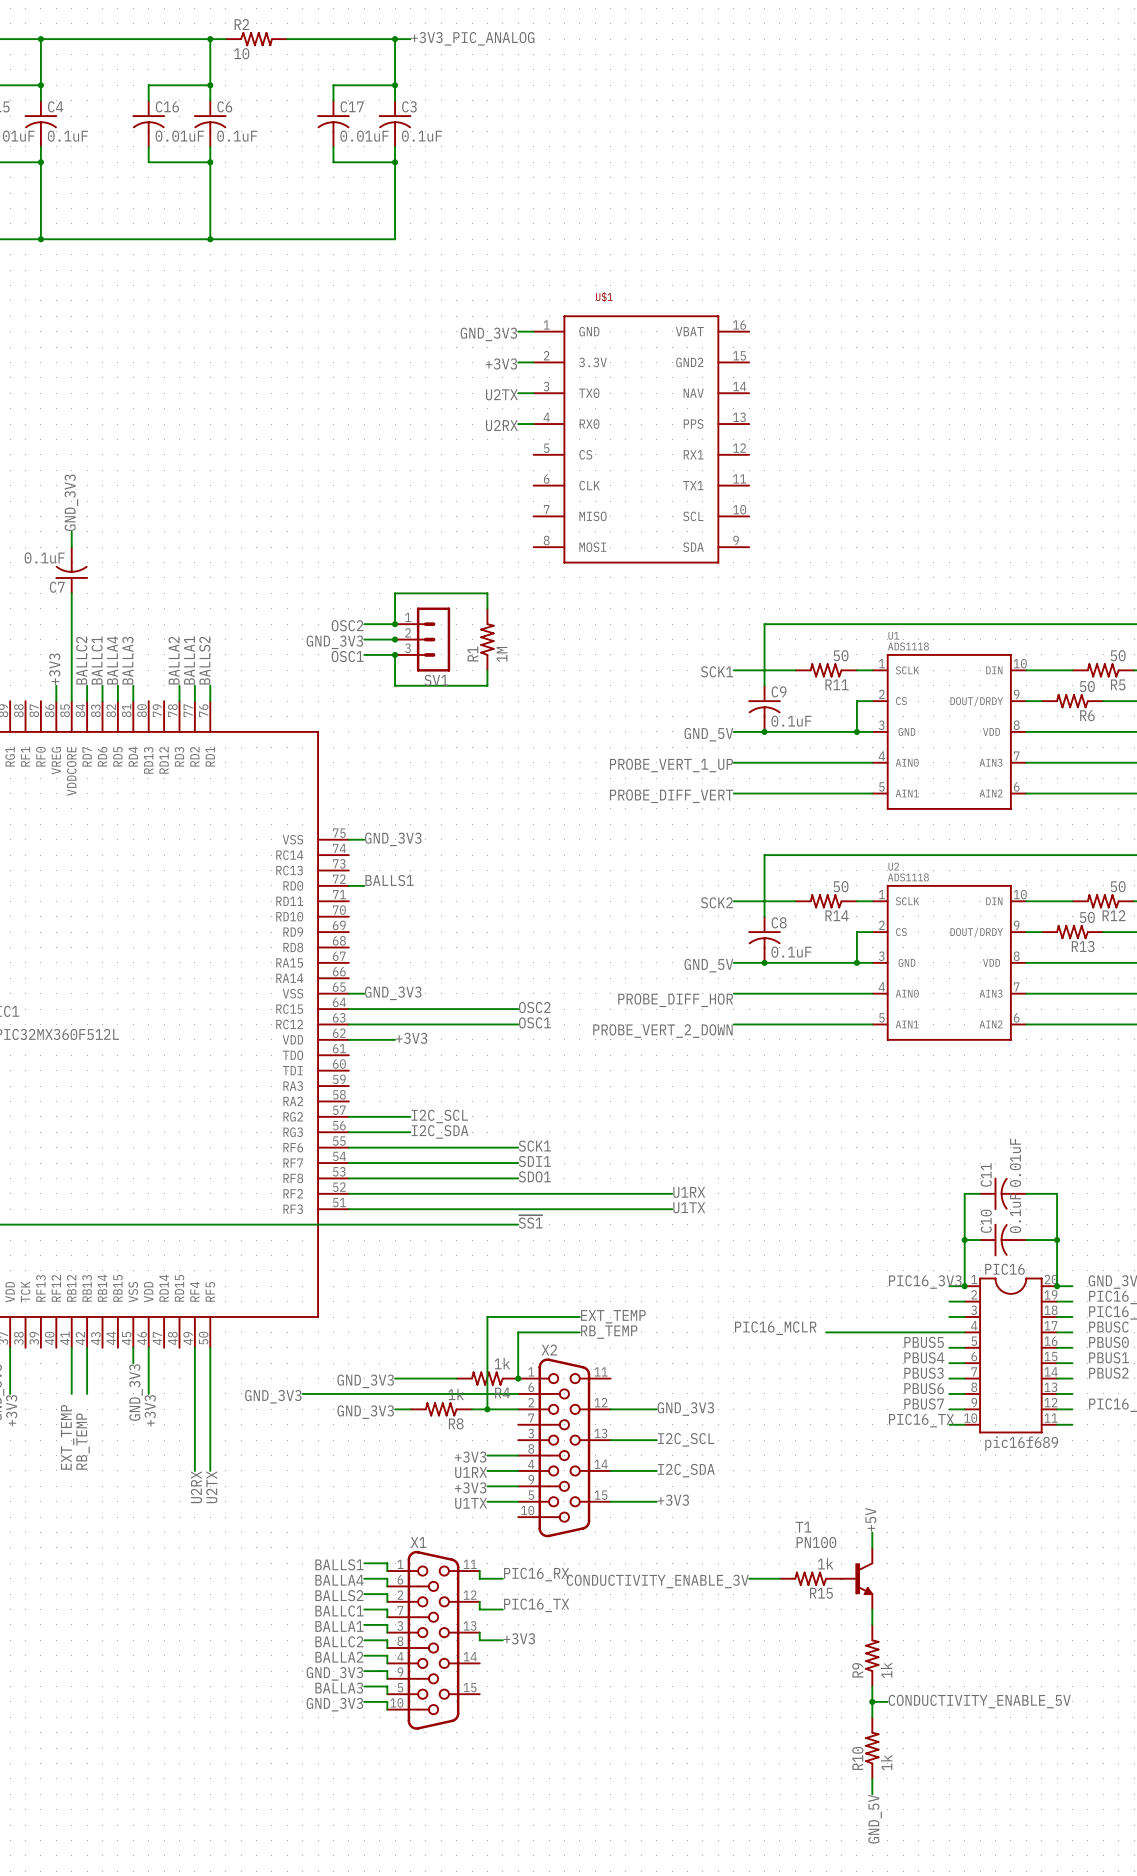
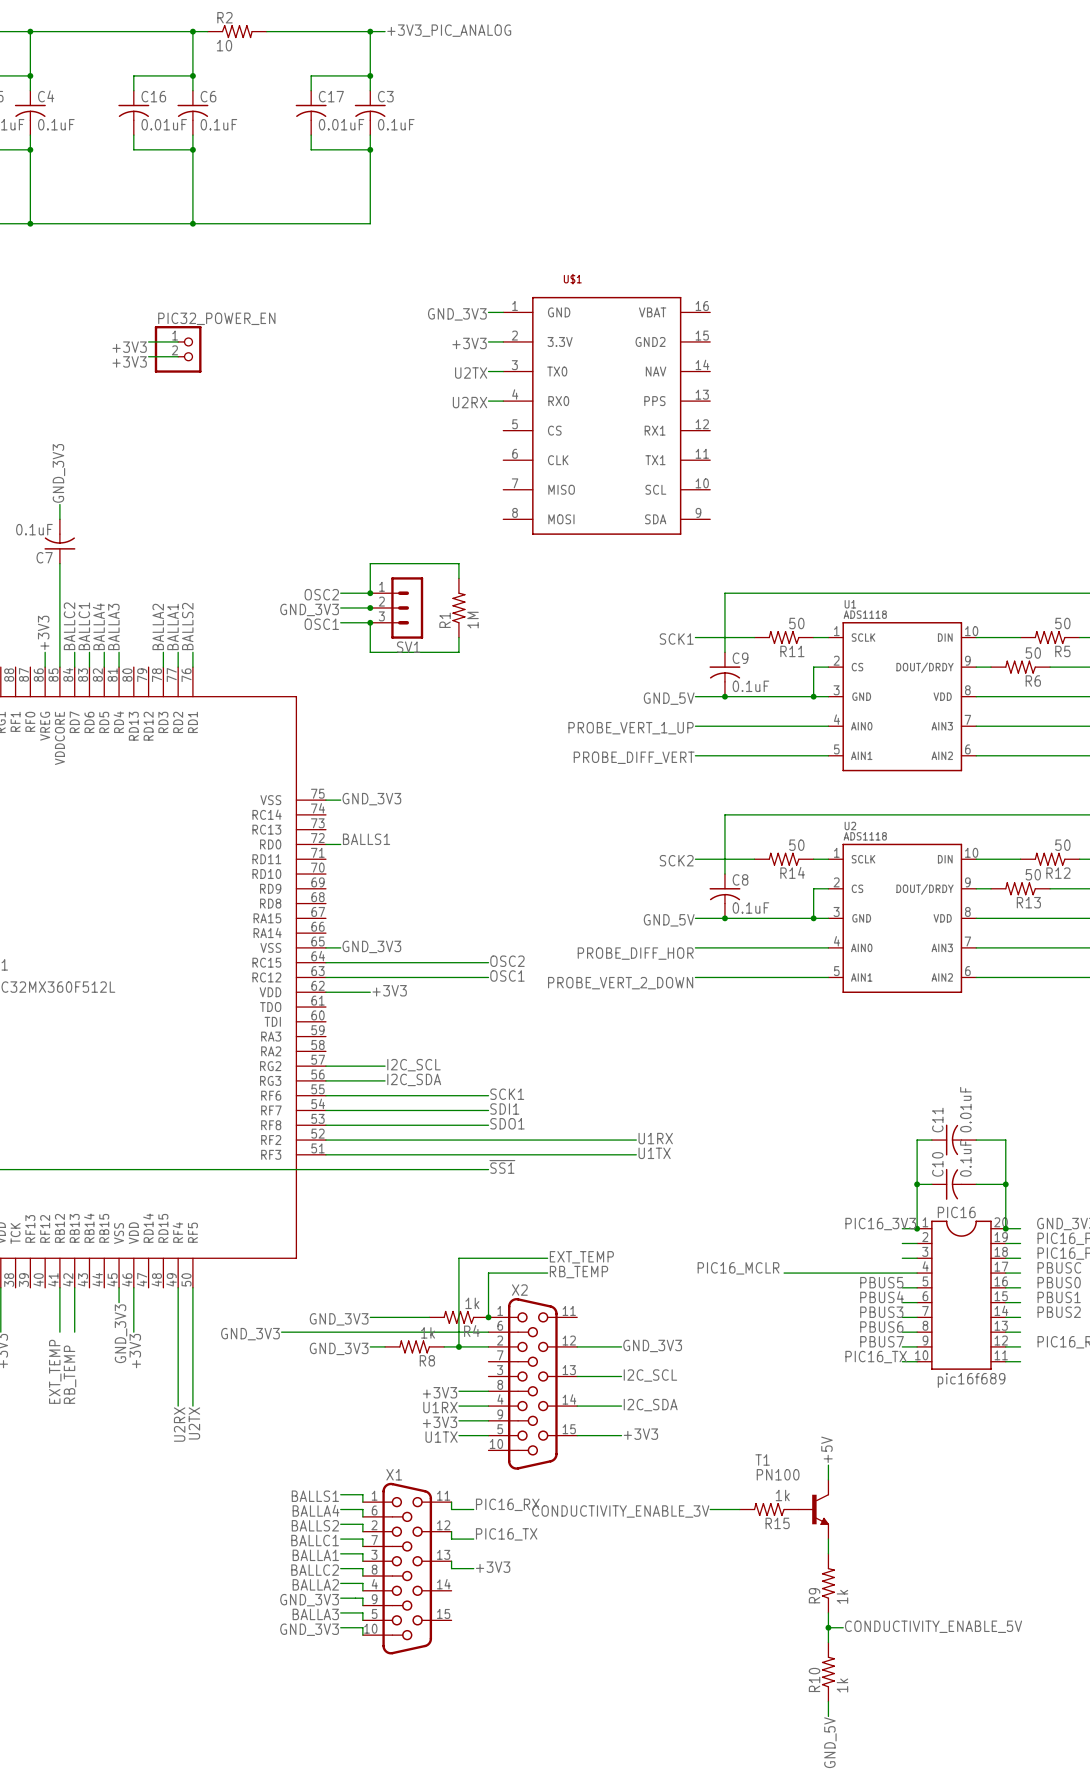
wire: none -> (148, 341) (178, 341)
label: none -> +3V3 (129, 347)
PIC32_POWER_EN: none -> (178, 349)
wire: none -> (148, 356) (178, 356)
label: none -> +3V3 (129, 361)

